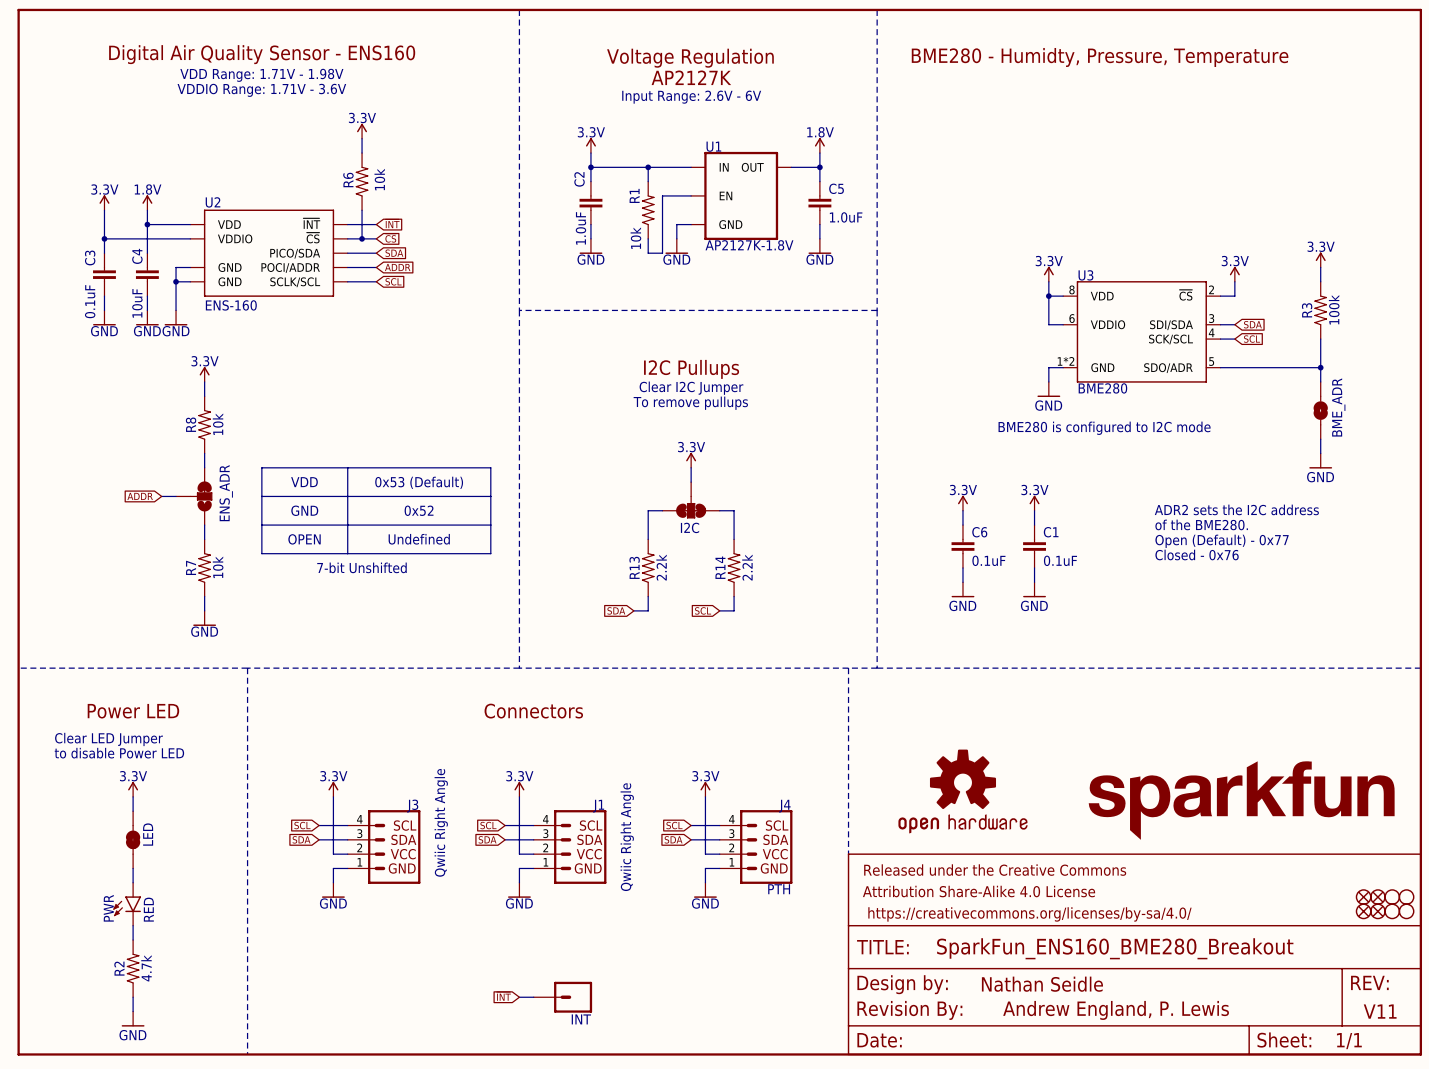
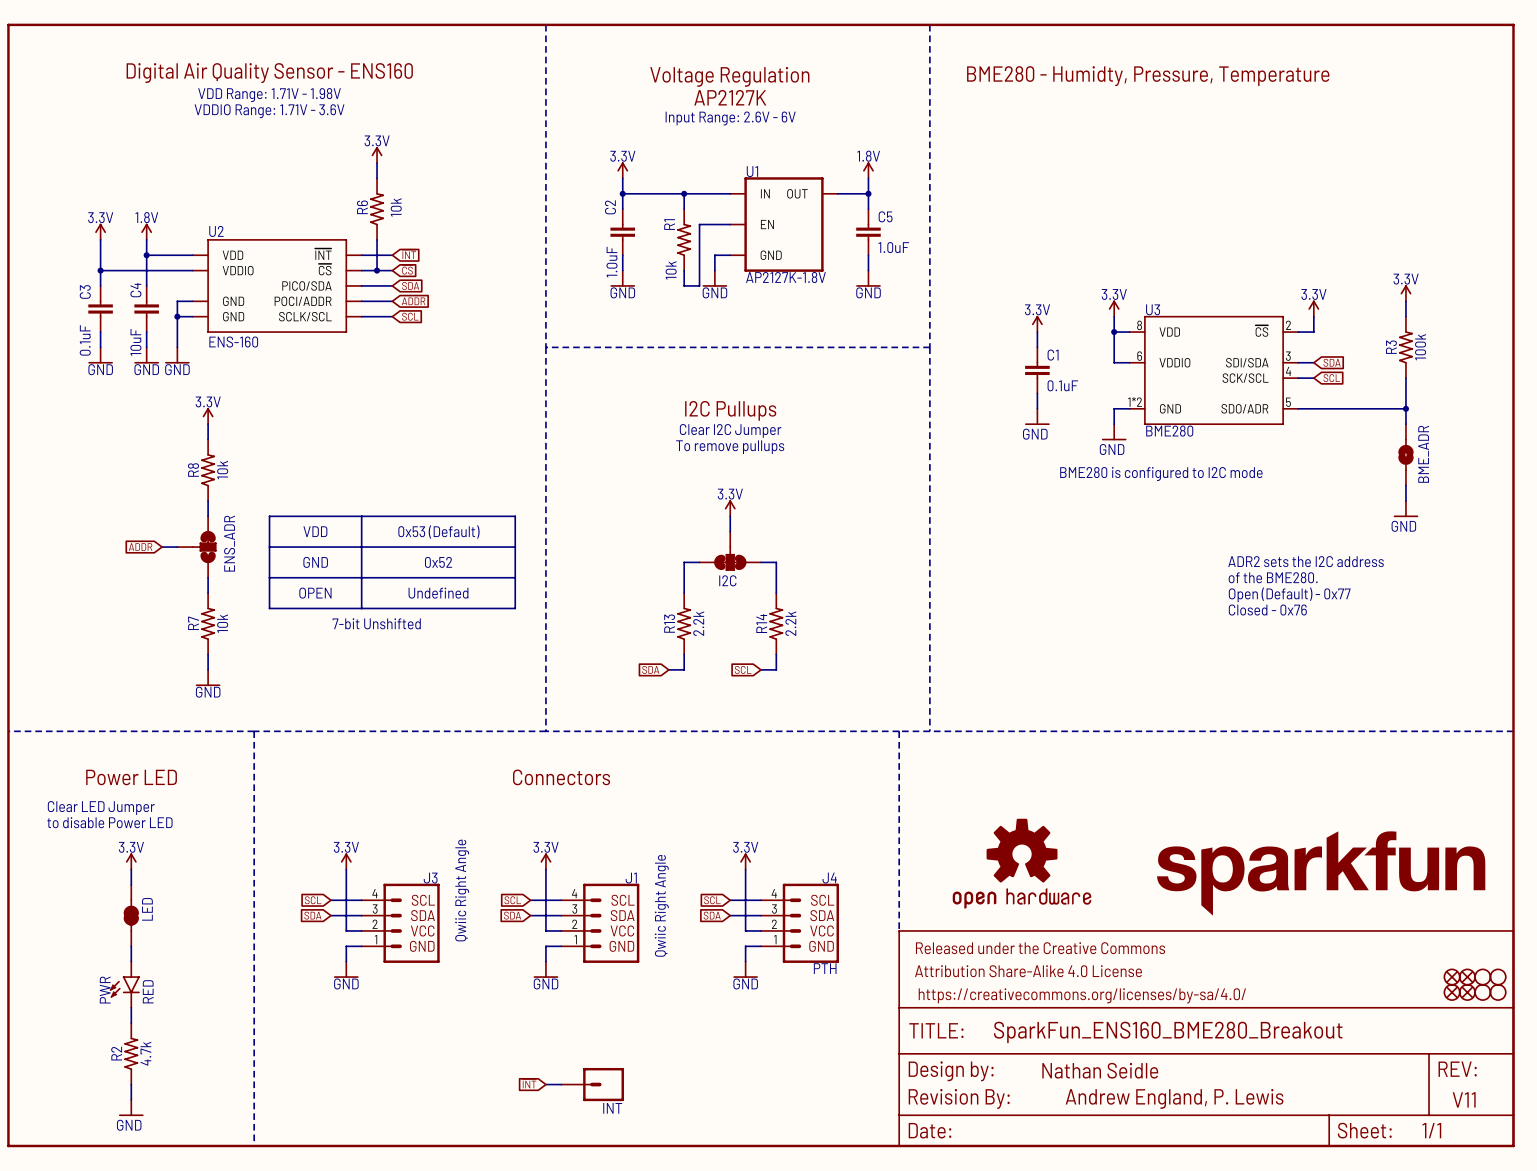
power symbol: none -> 3.3V (1037, 323)
wire: none -> (1037, 332) (1037, 347)
wire: none -> (1037, 393) (1037, 408)
power symbol: none -> GND (1037, 416)
power symbol: 3.3V (962, 503) -> none
power symbol: 3.3V (1034, 503) -> none
wire: (962, 510) (962, 525) -> none
wire: (1034, 510) (1034, 525) -> none
C6: 0.1uF (962, 546) -> none
C1 position: (1034, 546) -> (1037, 370)
wire: (962, 567) (962, 582) -> none
wire: (1034, 567) (1034, 582) -> none
power symbol: GND (962, 589) -> none
power symbol: GND (1034, 589) -> none

